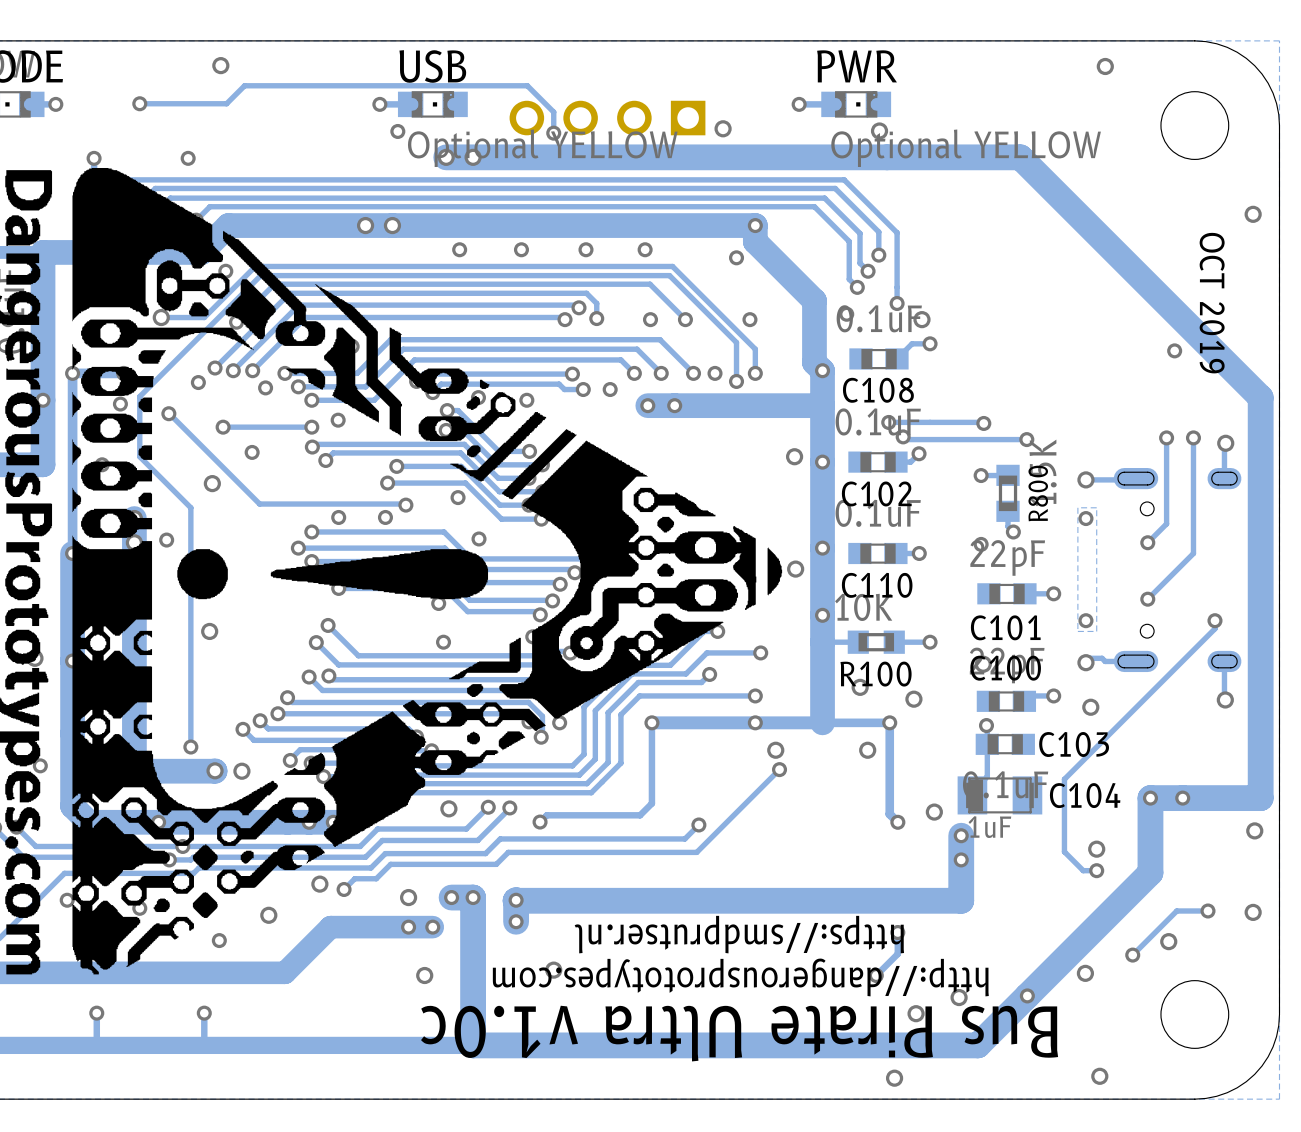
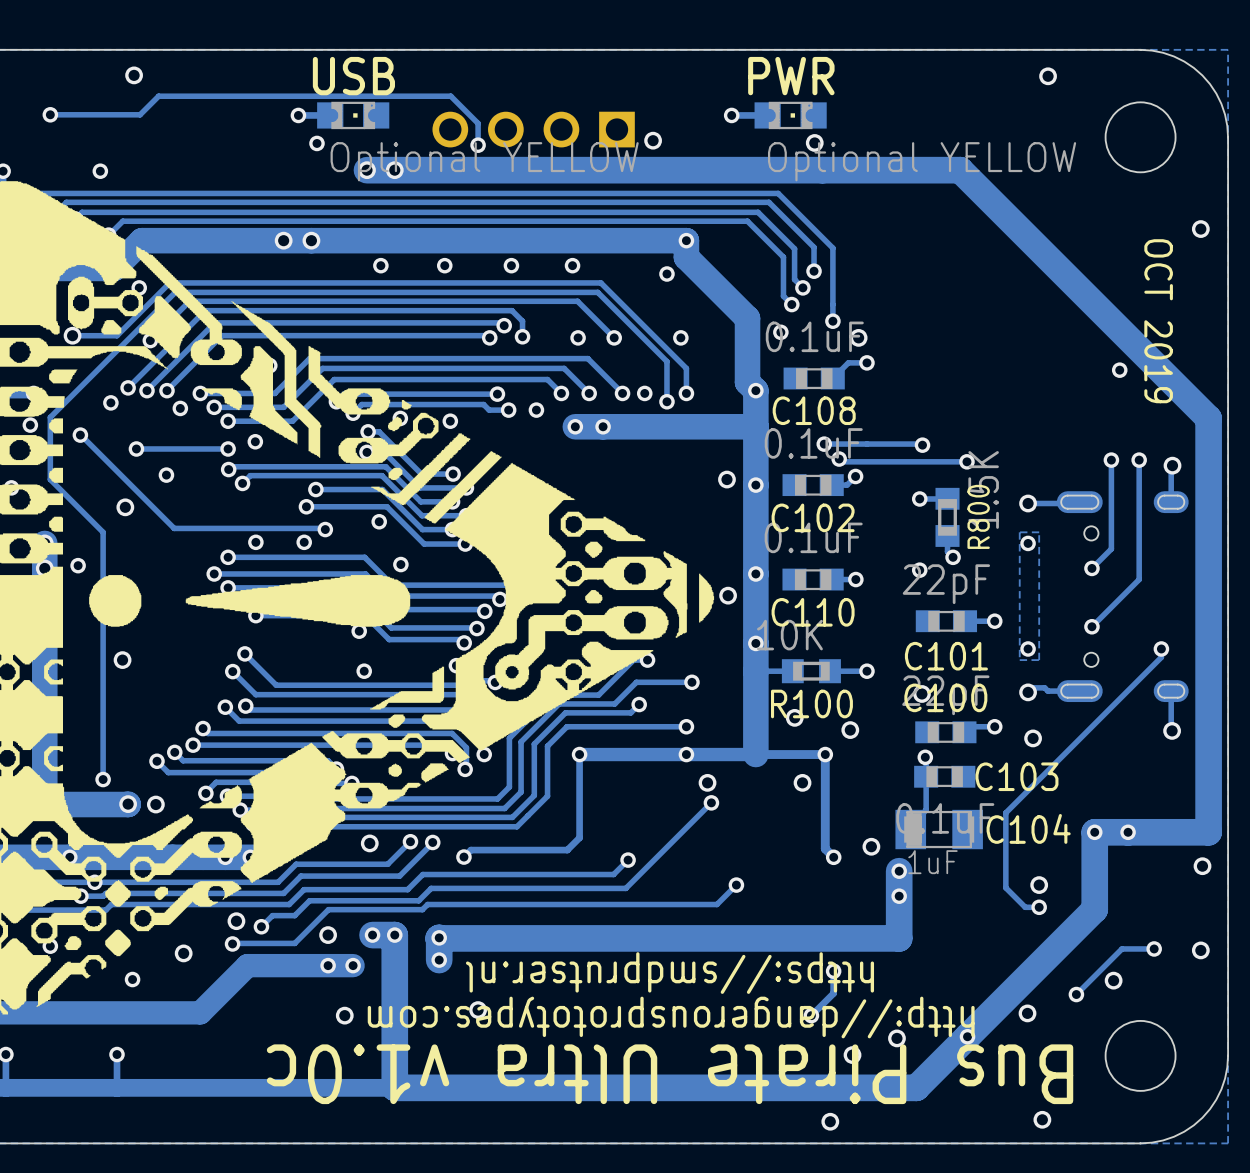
track: none -> (736, 885) (716, 904) (427, 904) (422, 909) (328, 909) (294, 943) (232, 943)
via: none -> (736, 885)
via: none -> (232, 943)

